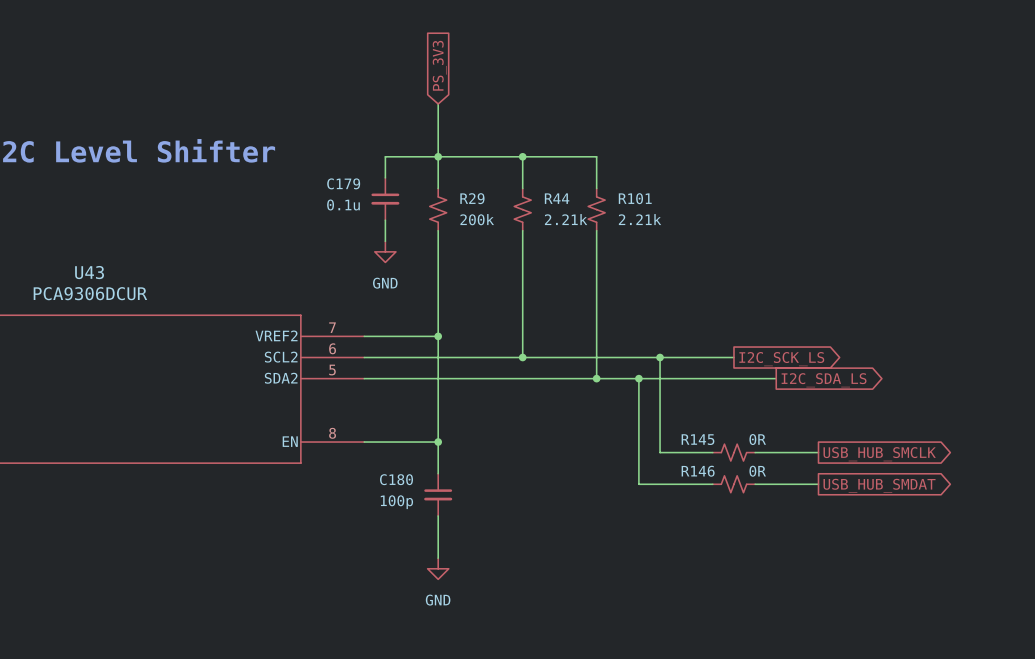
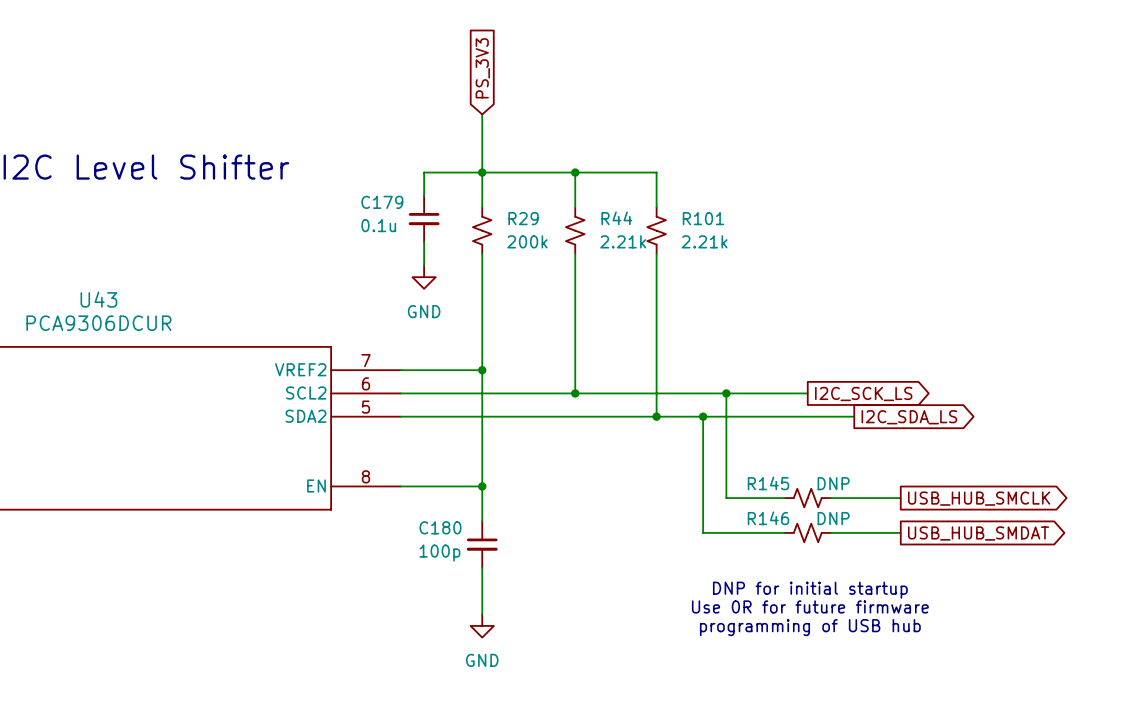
R145 value: 0R (757, 439) -> DNP (833, 483)
R146 value: 0R (757, 471) -> DNP (833, 518)
text: none -> DNP for initial startup (810, 590)
text: none -> Use 0R for future firmware (810, 606)
text: none -> programming of USB hub (810, 627)

